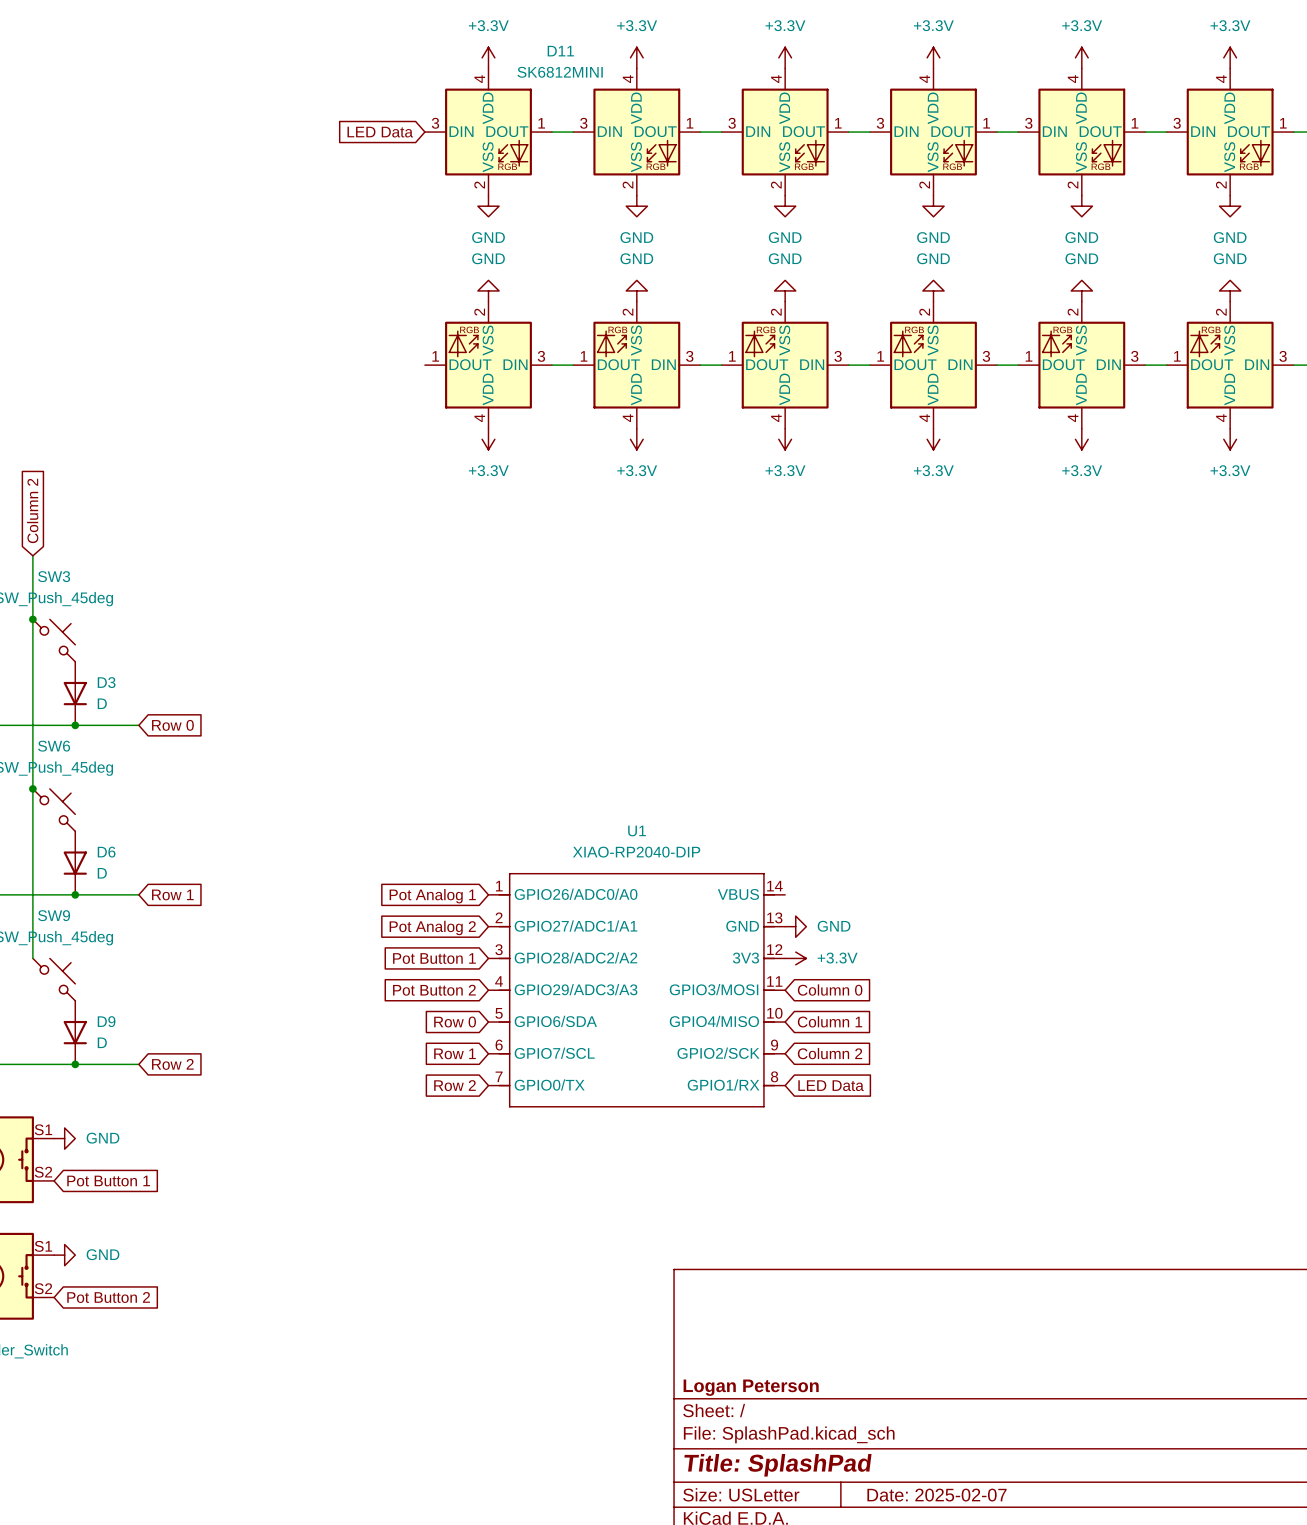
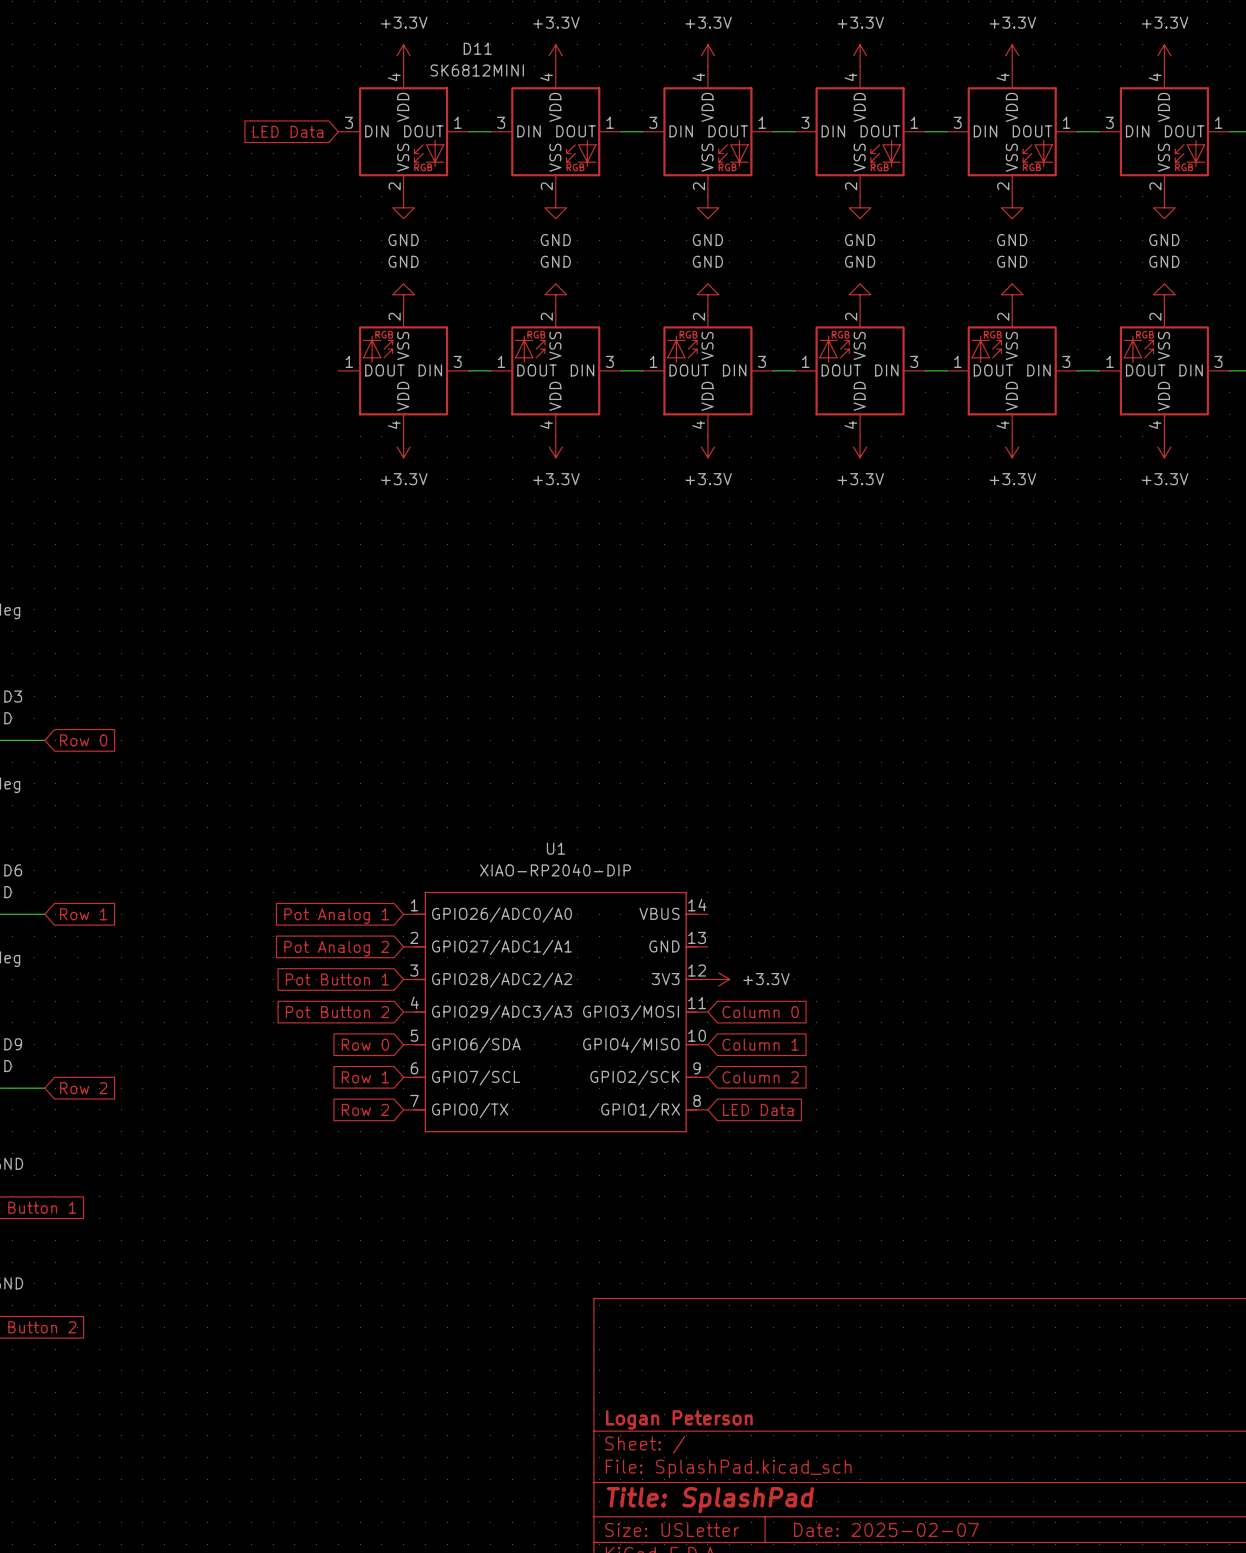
power symbol: GND (795, 926) -> none

